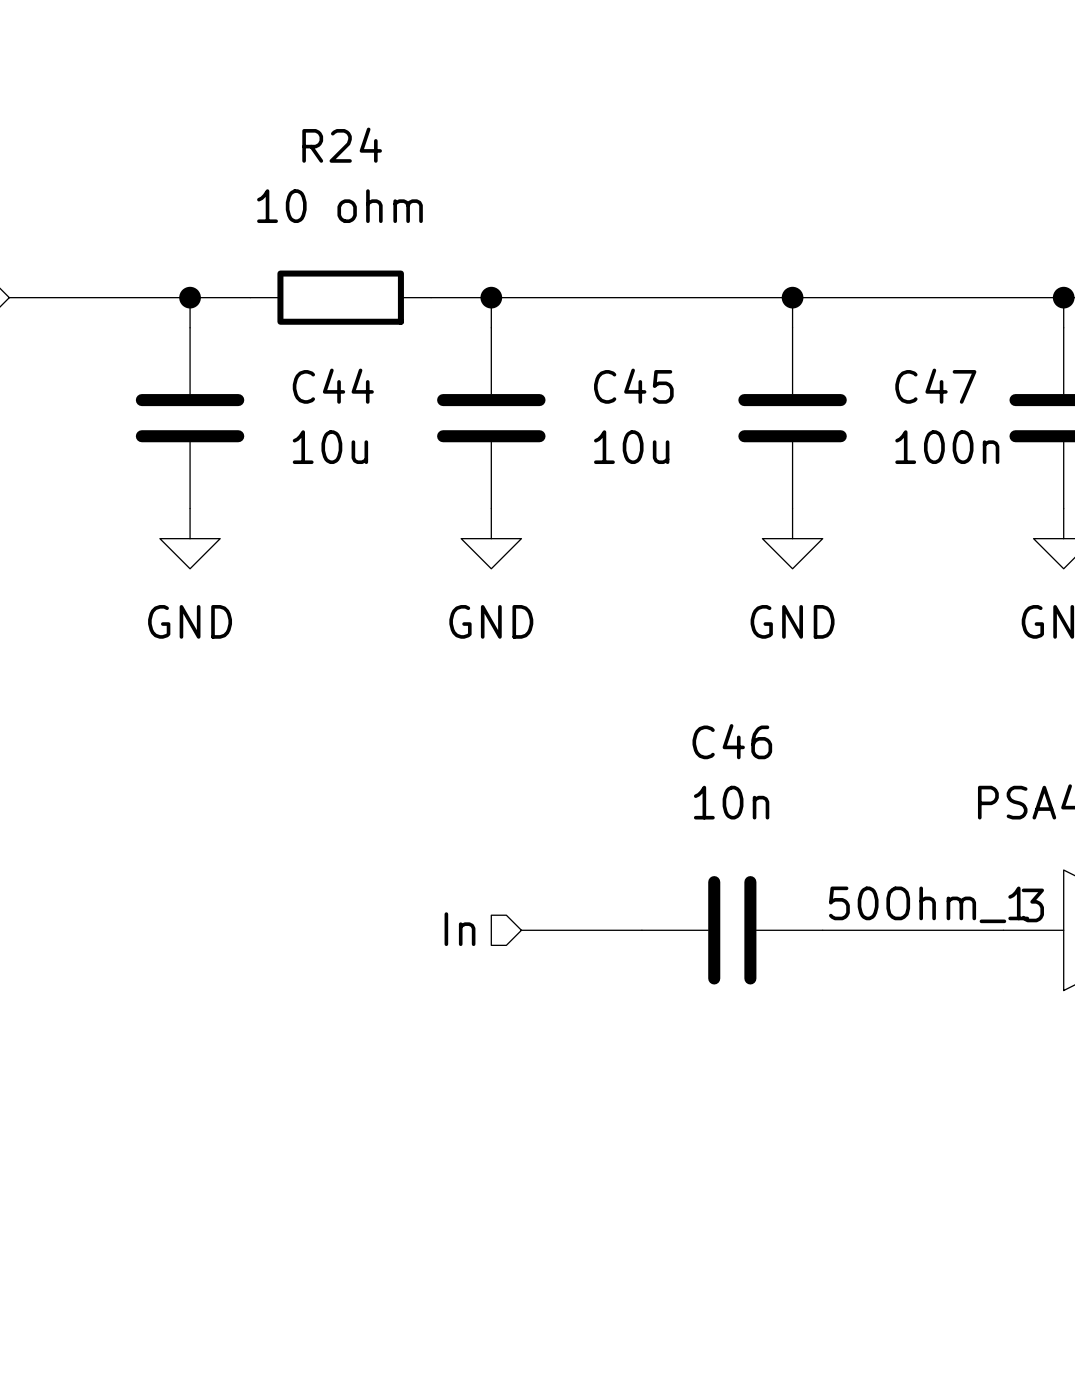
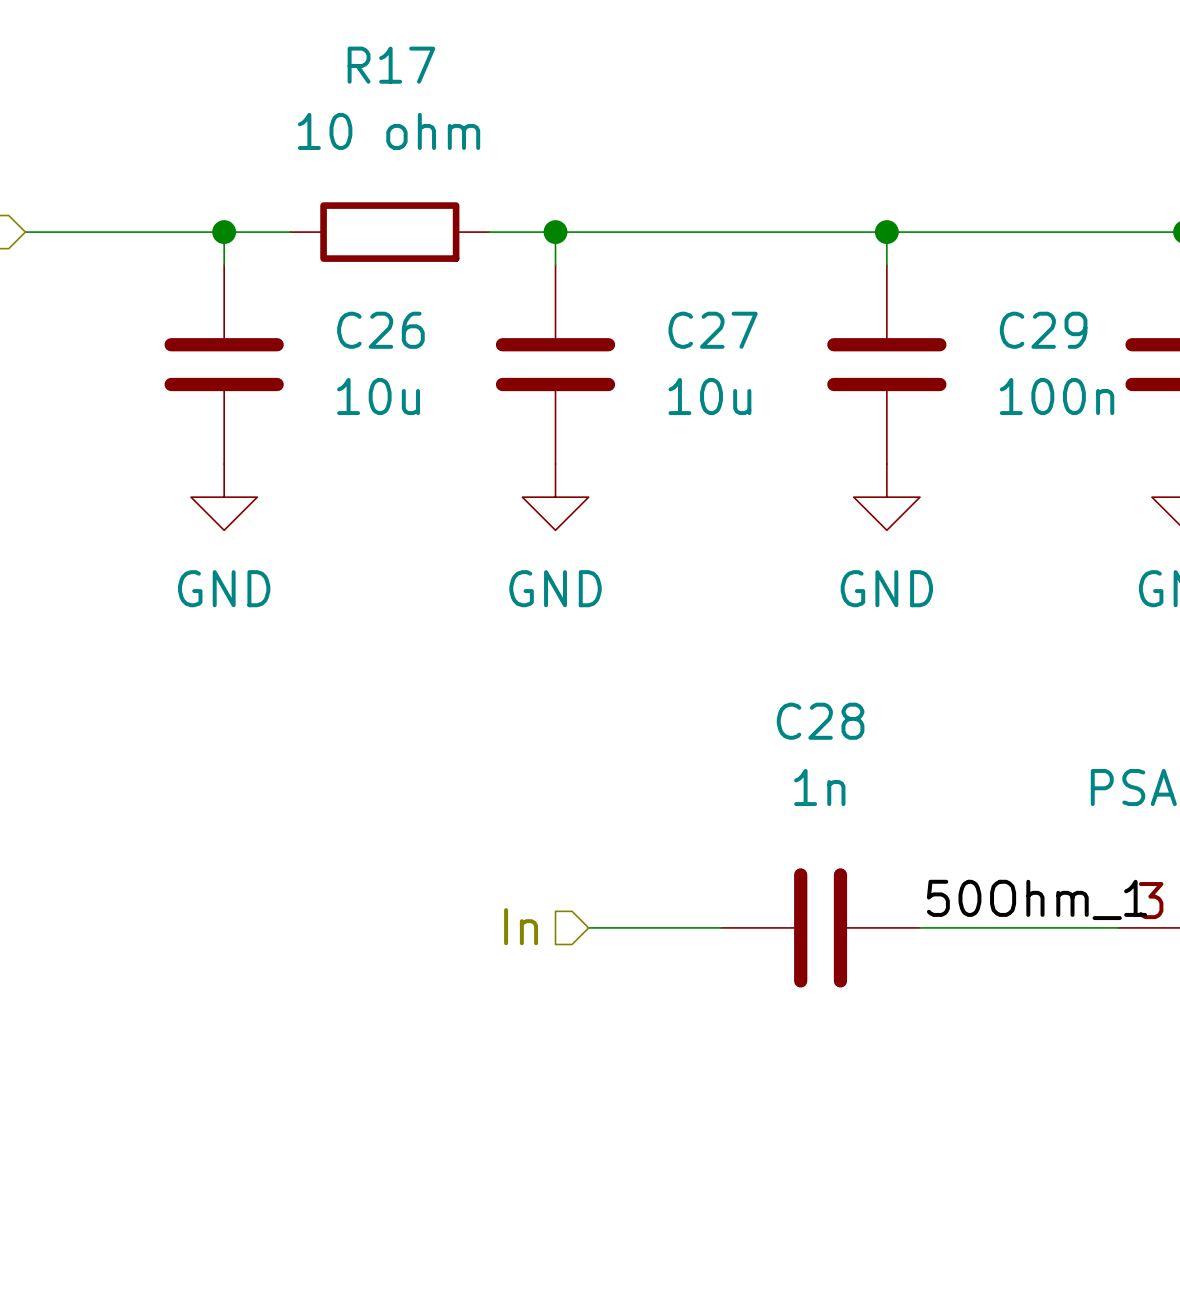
R24 name: R24 (342, 145) -> R17 (391, 65)
C44 name: C44 (333, 386) -> C26 (380, 330)
C45 name: C45 (633, 386) -> C27 (713, 330)
C47 name: C47 (935, 386) -> C29 (1043, 330)
C46 name: C46 (732, 741) -> C28 (820, 721)
C46 value: 10n (731, 802) -> 1n (819, 787)

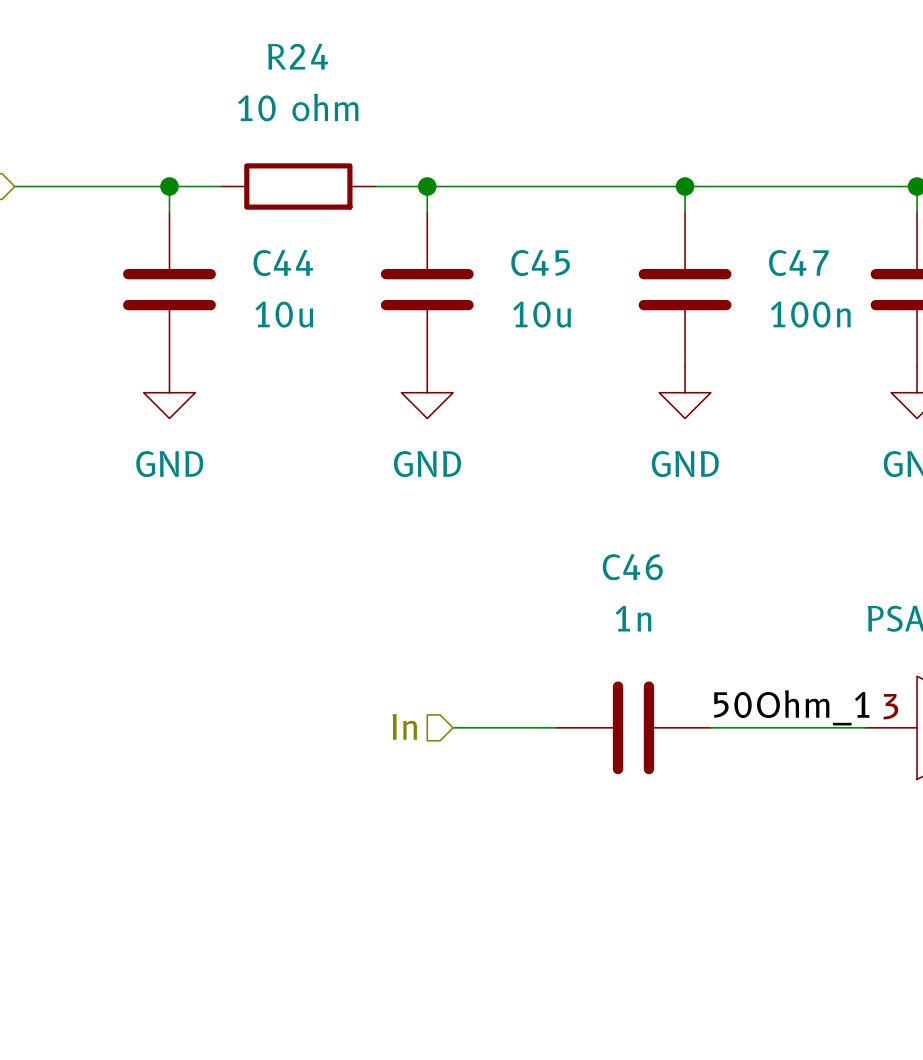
R17 name: R17 (391, 65) -> R24 (297, 56)
C26 name: C26 (380, 330) -> C44 (283, 263)
C27 name: C27 (713, 330) -> C45 (540, 263)
C29 name: C29 (1043, 330) -> C47 (798, 263)
C28 name: C28 (820, 721) -> C46 (632, 567)

